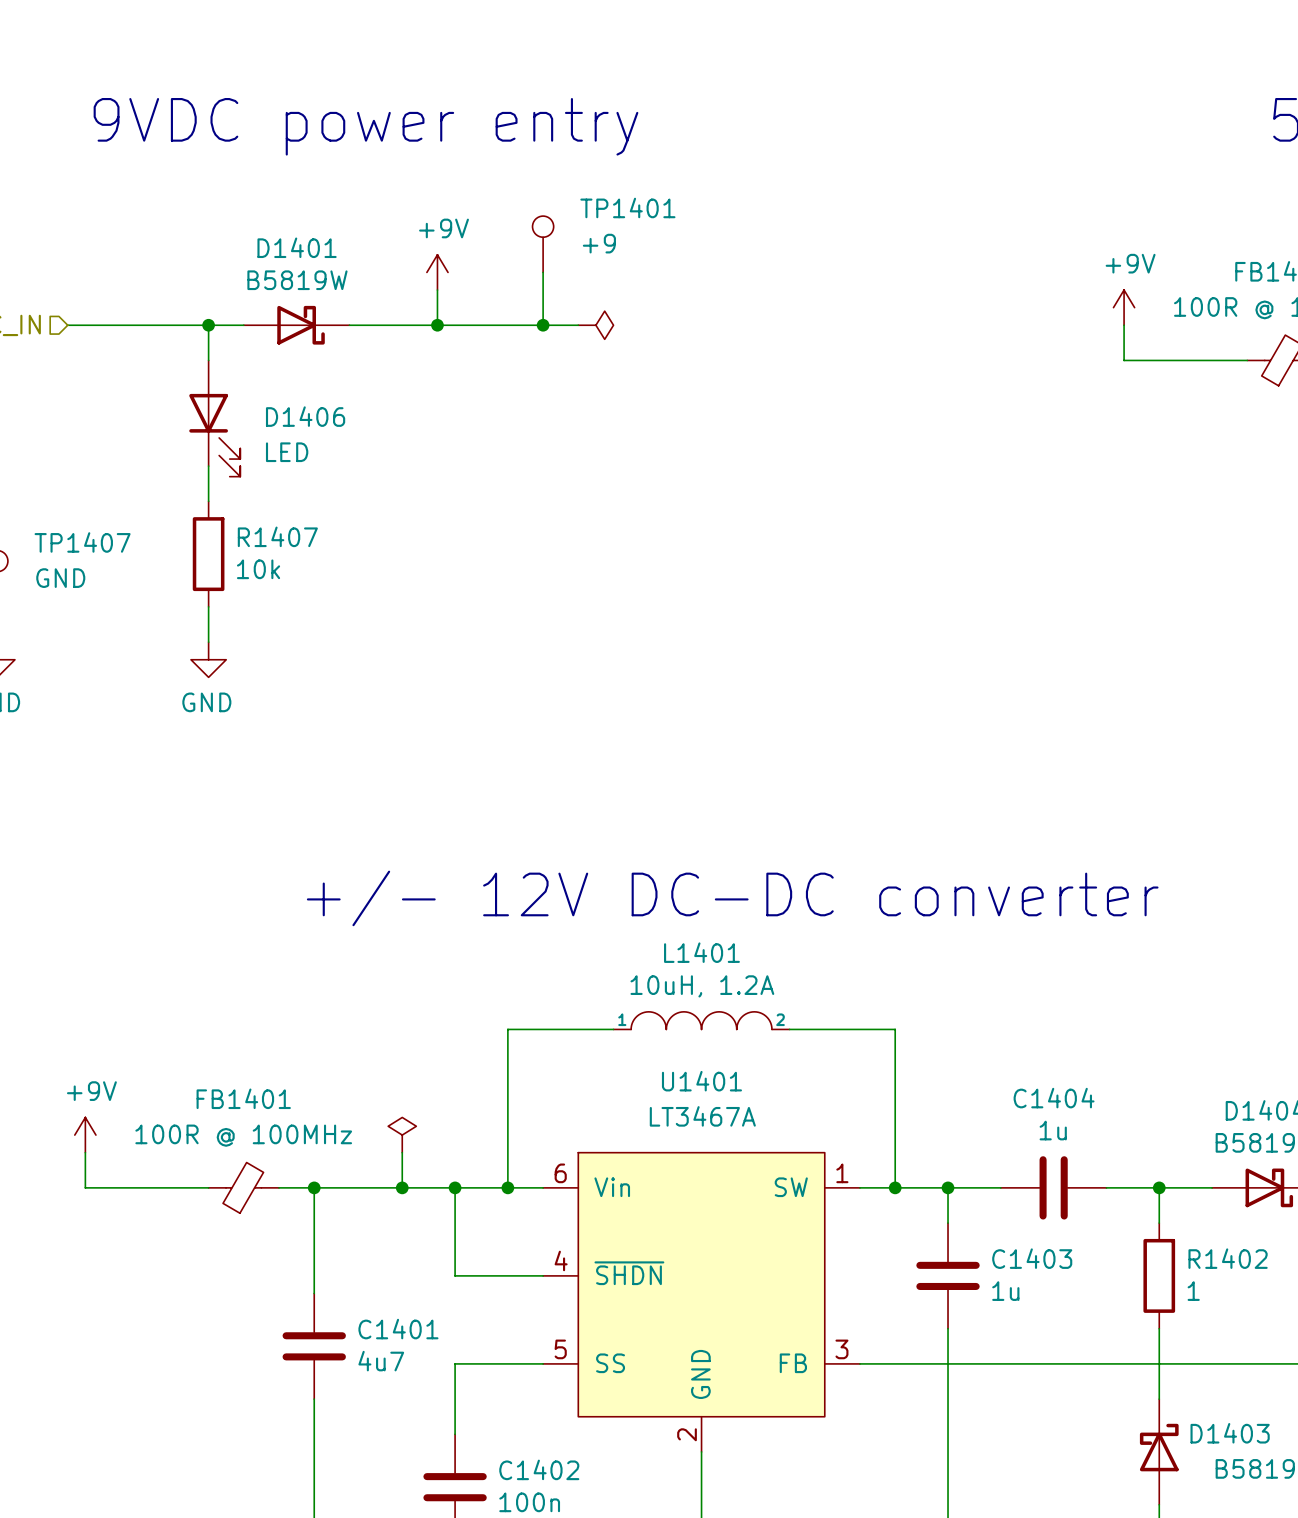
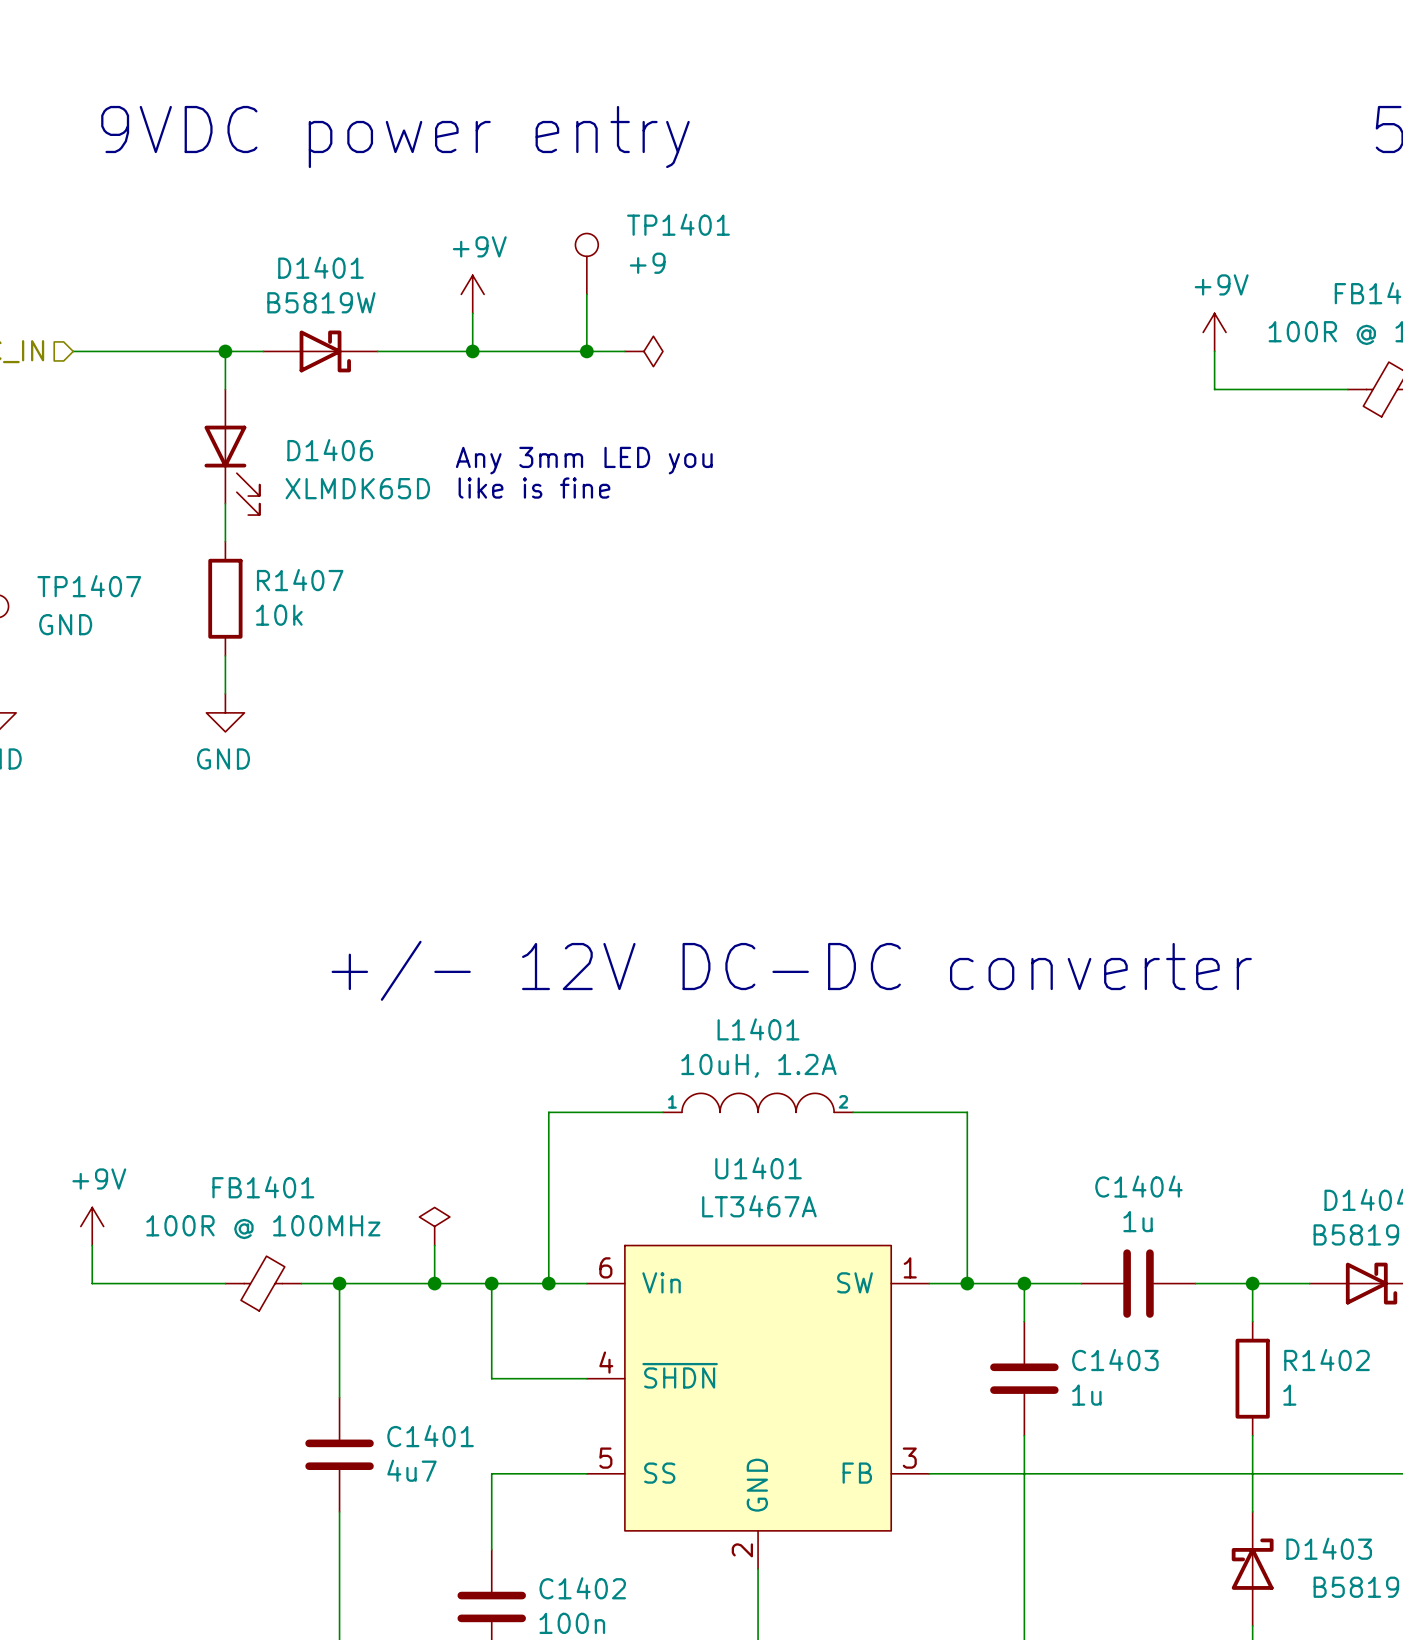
text: none -> Any 3mm LED you (584, 460)
text: none -> like is fine (534, 488)
D1406 value: LED (287, 452) -> XLMDK65D (357, 488)

